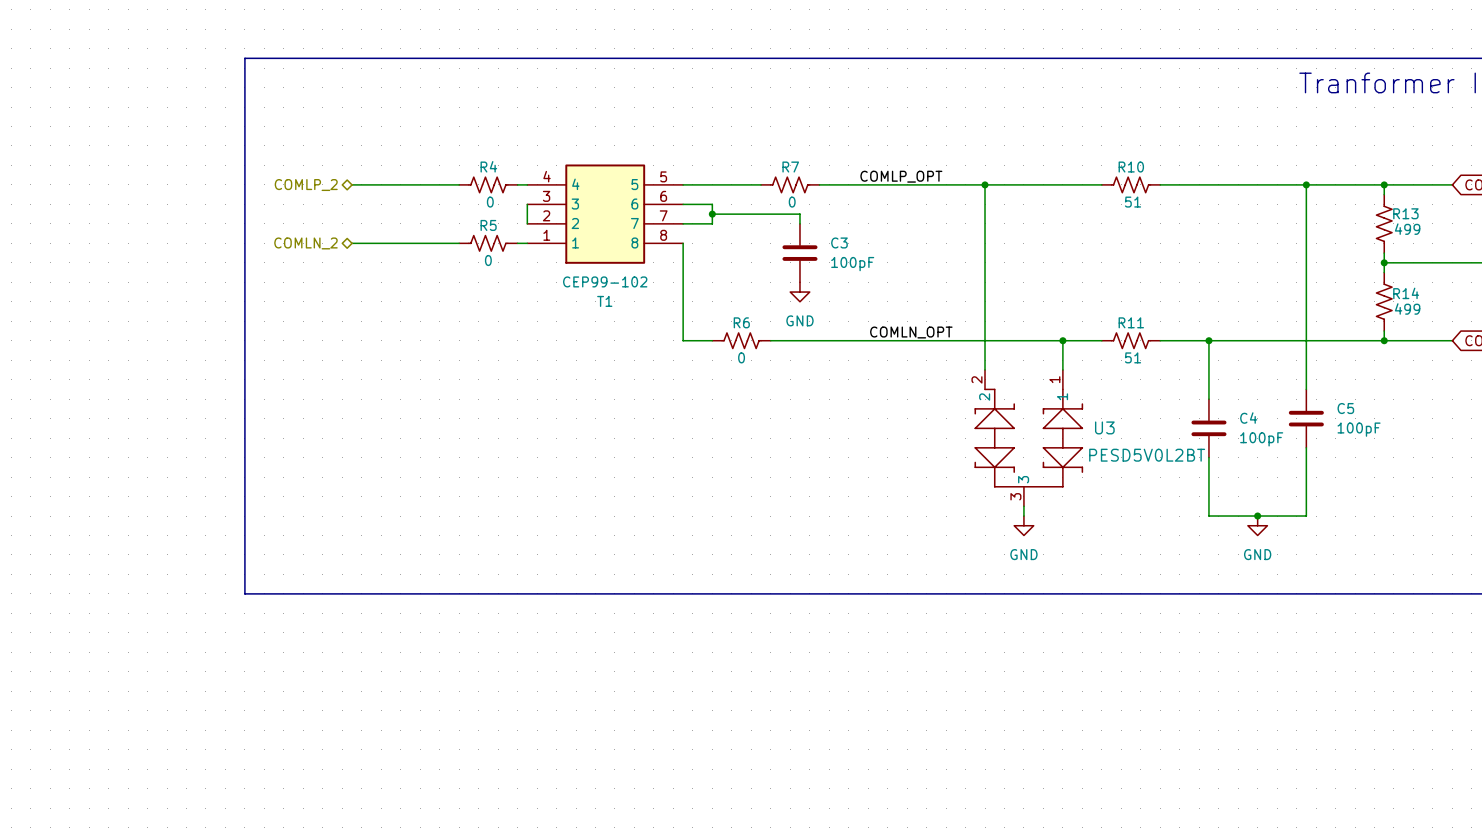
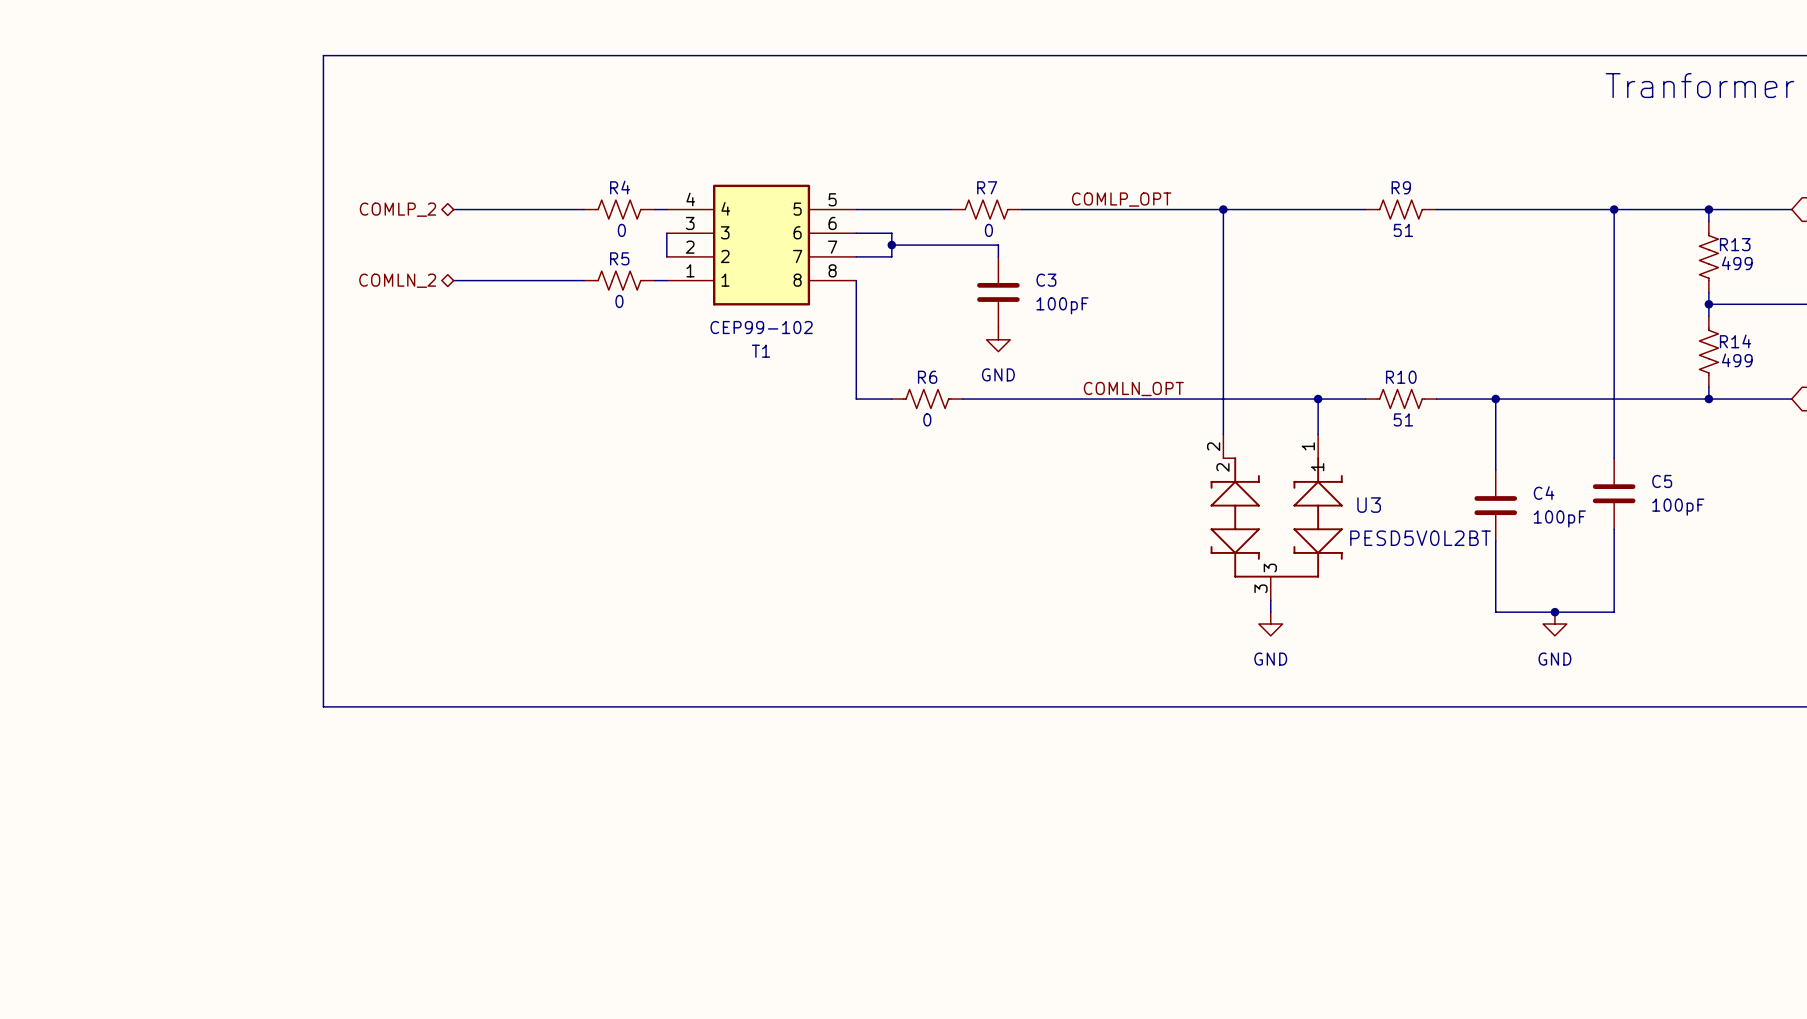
R10 name: R10 (1131, 167) -> R9 (1401, 187)
R11 name: R11 (1131, 322) -> R10 (1401, 377)

